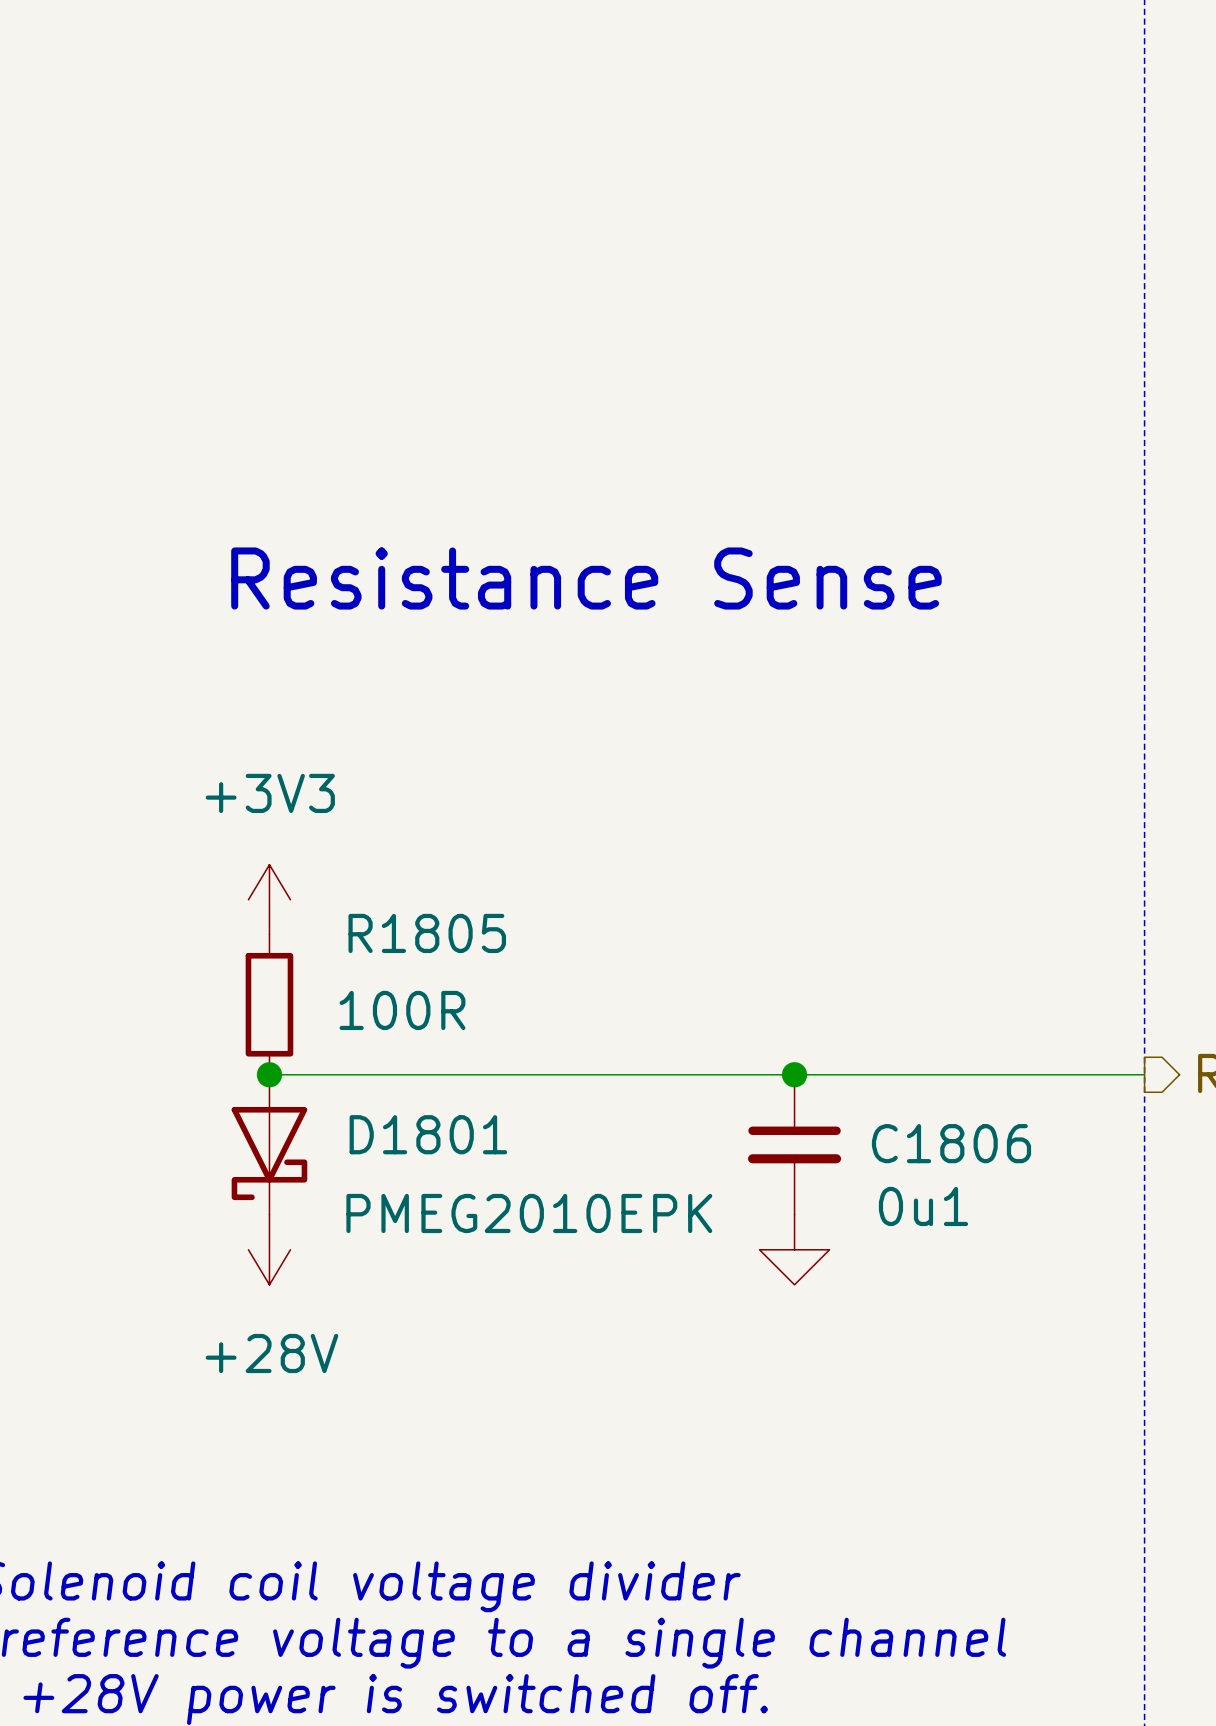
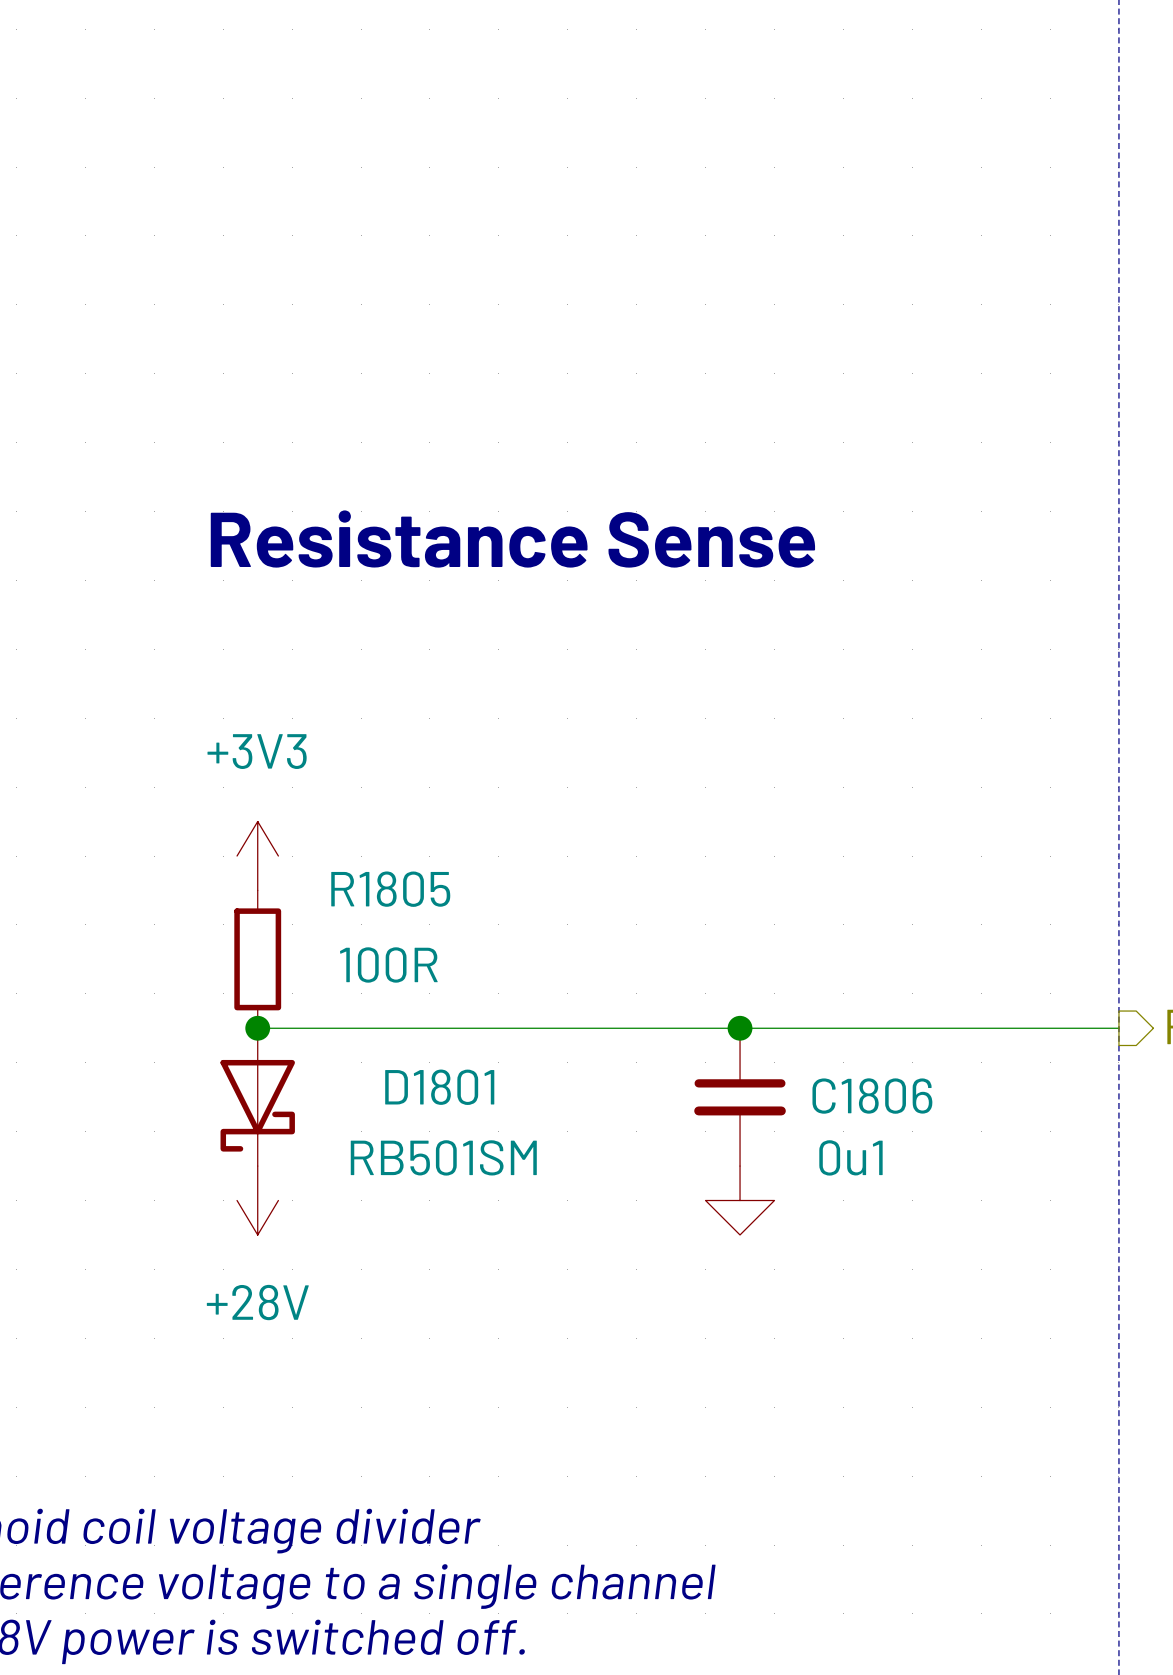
junction position: (794, 1074) -> (740, 1028)
C1806 position: (794, 1144) -> (740, 1097)
D1801 value: PMEG2010EPK (529, 1213) -> RB501SM (443, 1157)
power symbol position: (794, 1249) -> (740, 1200)

